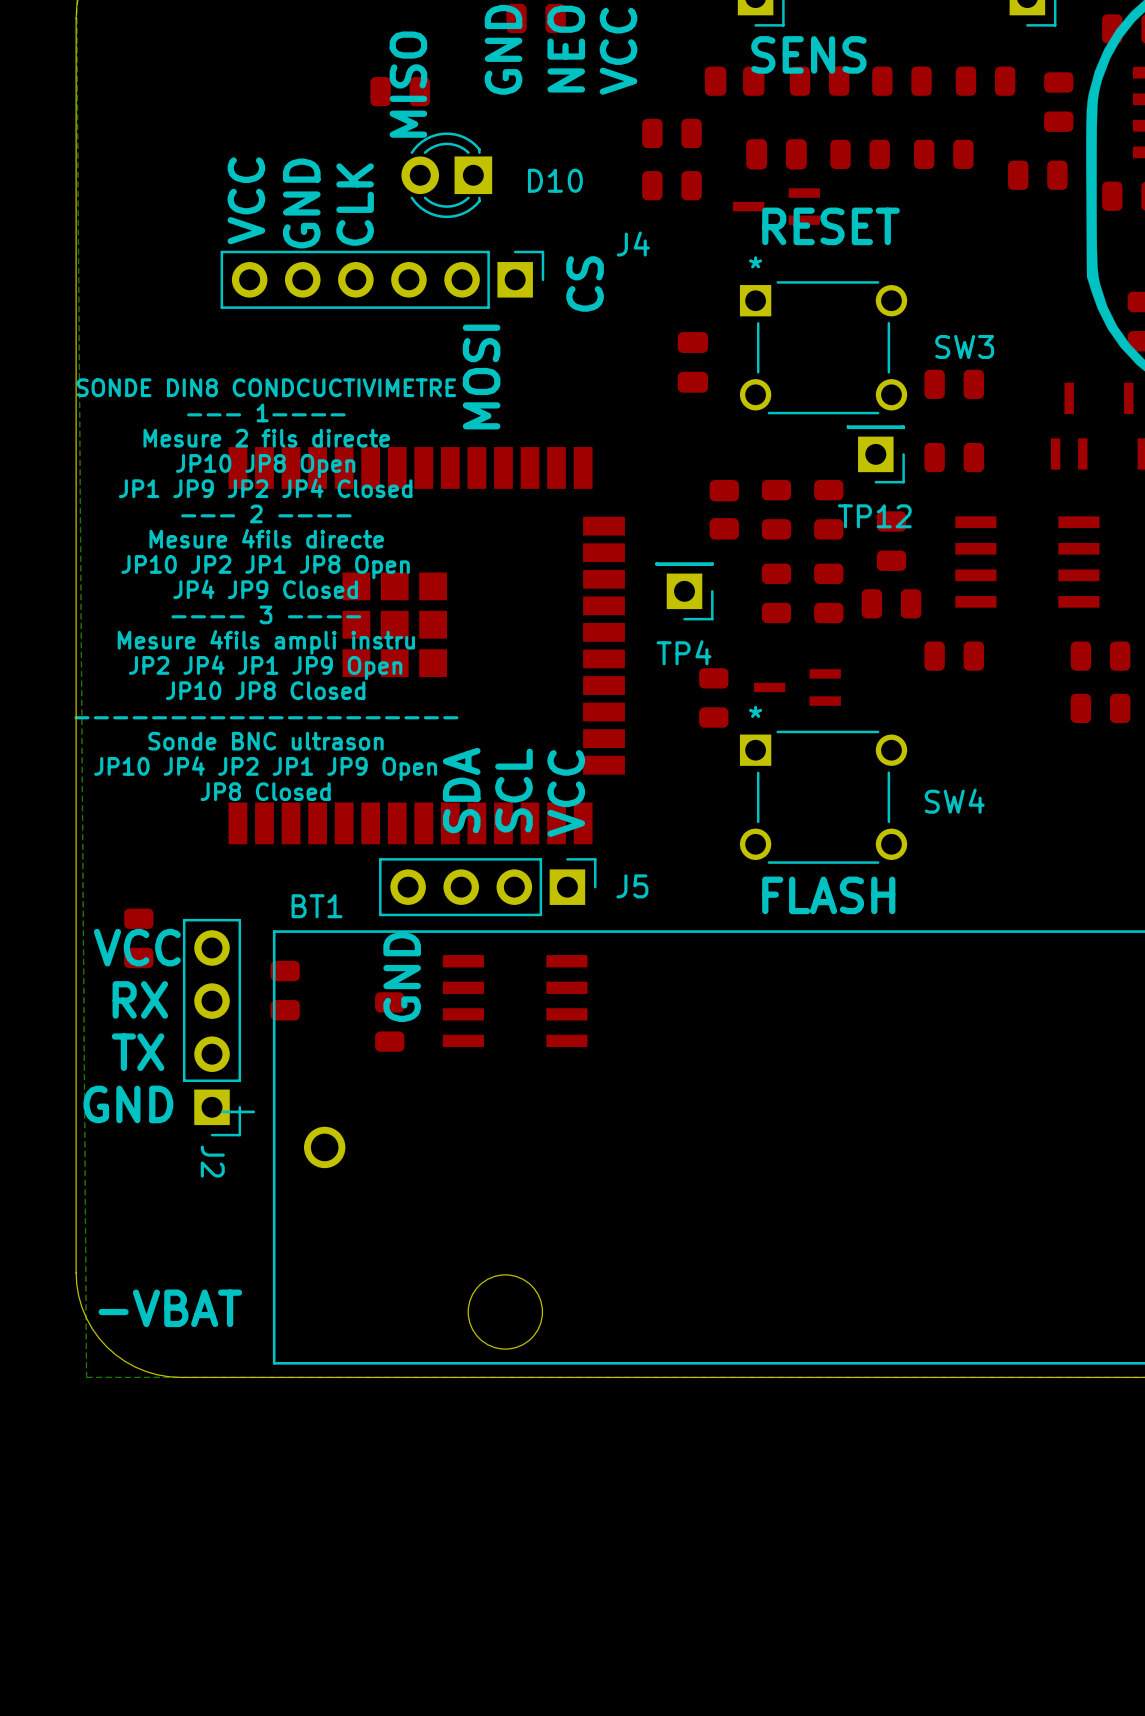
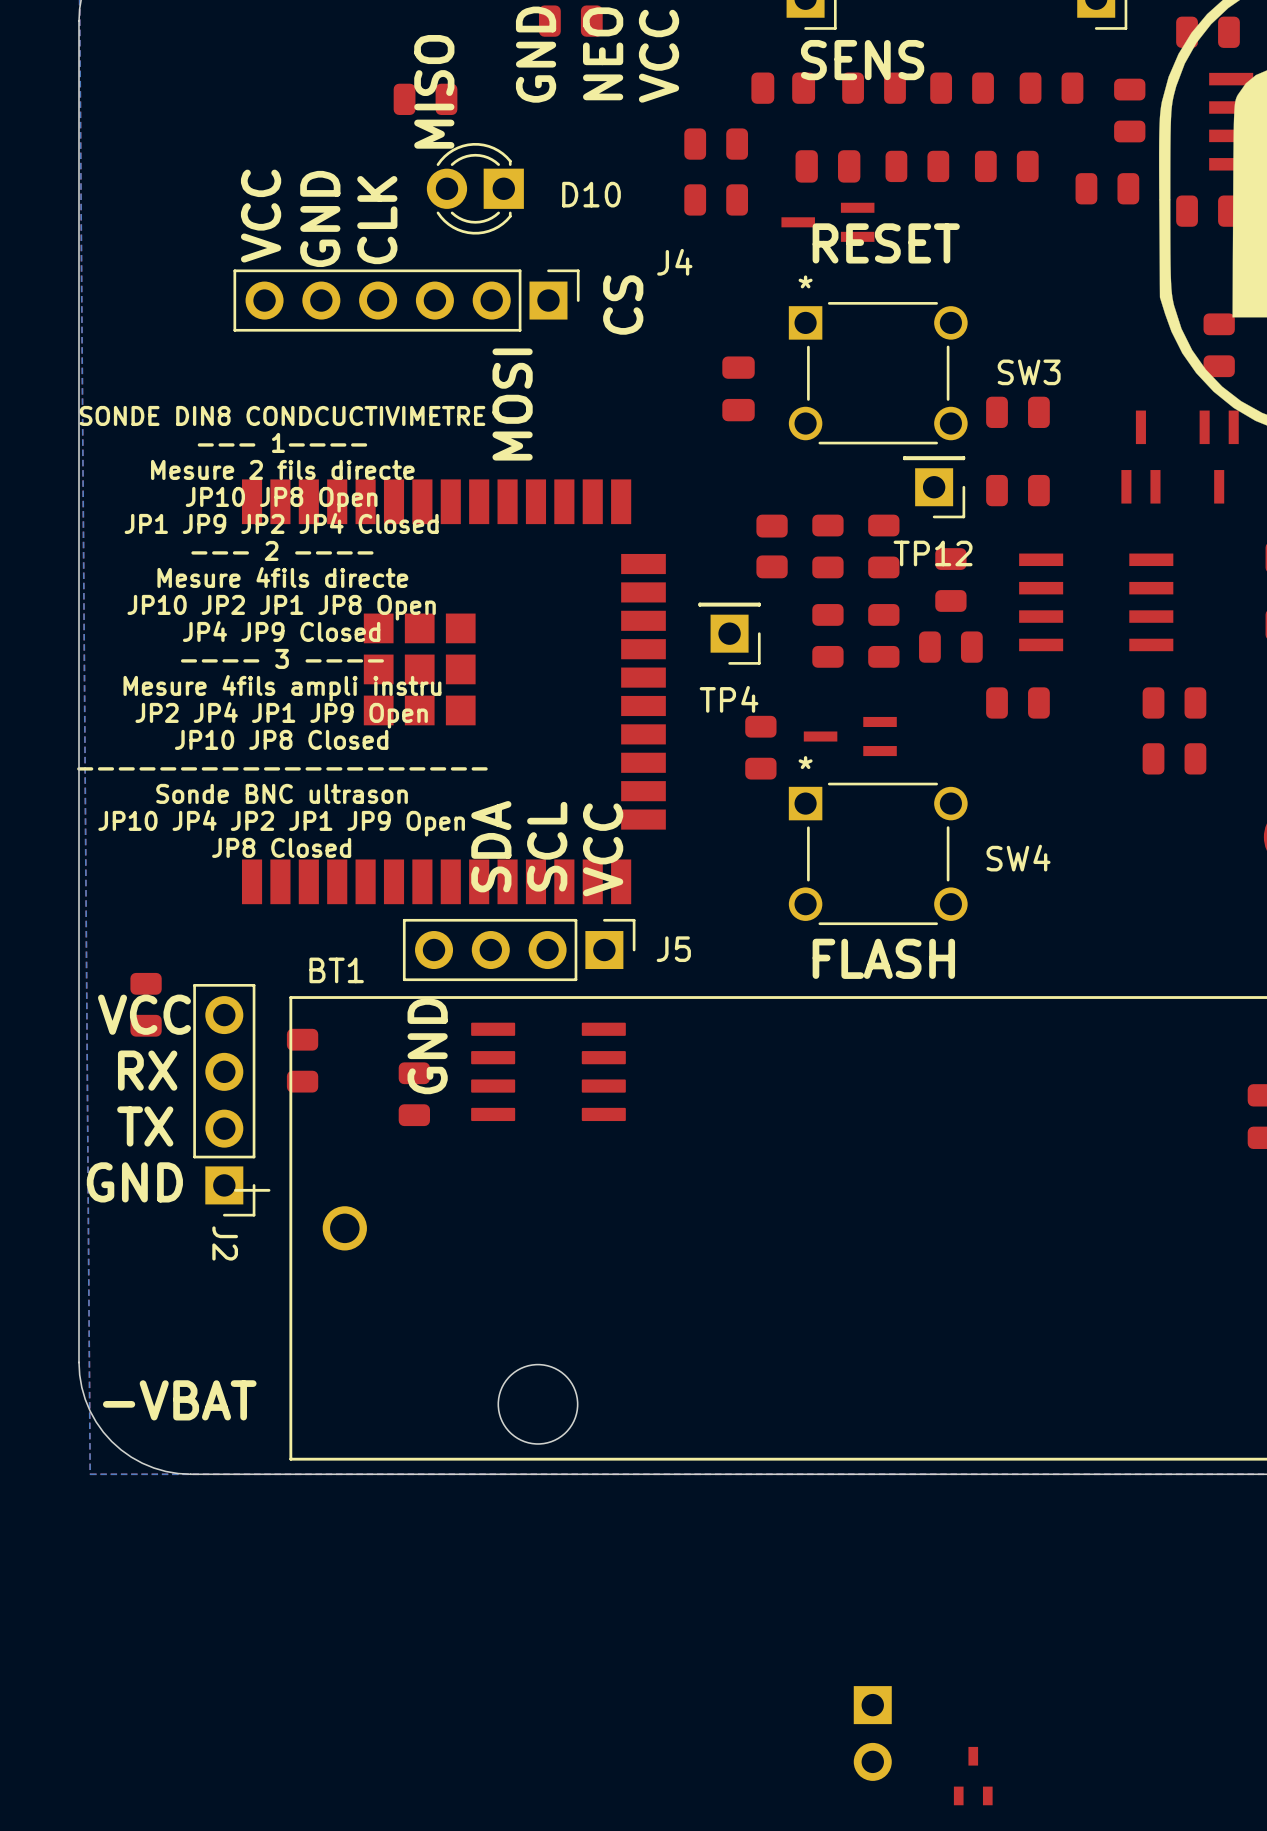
part: none -> (872, 1733)
part: none -> (973, 1776)

